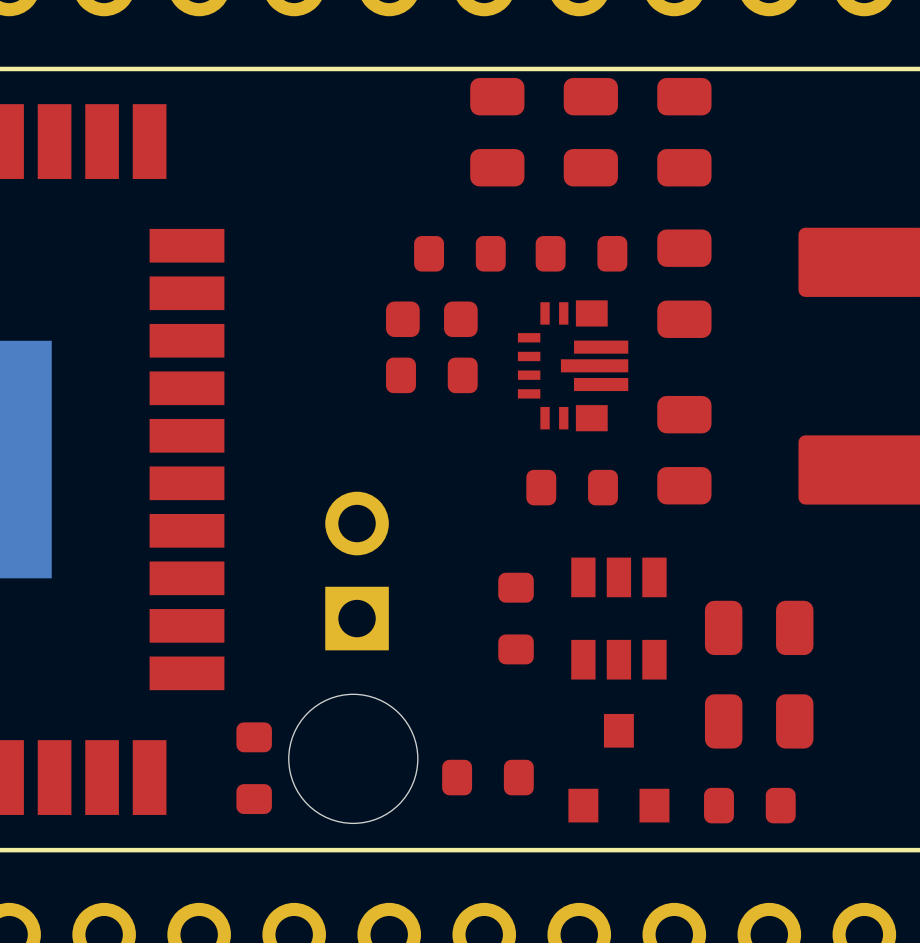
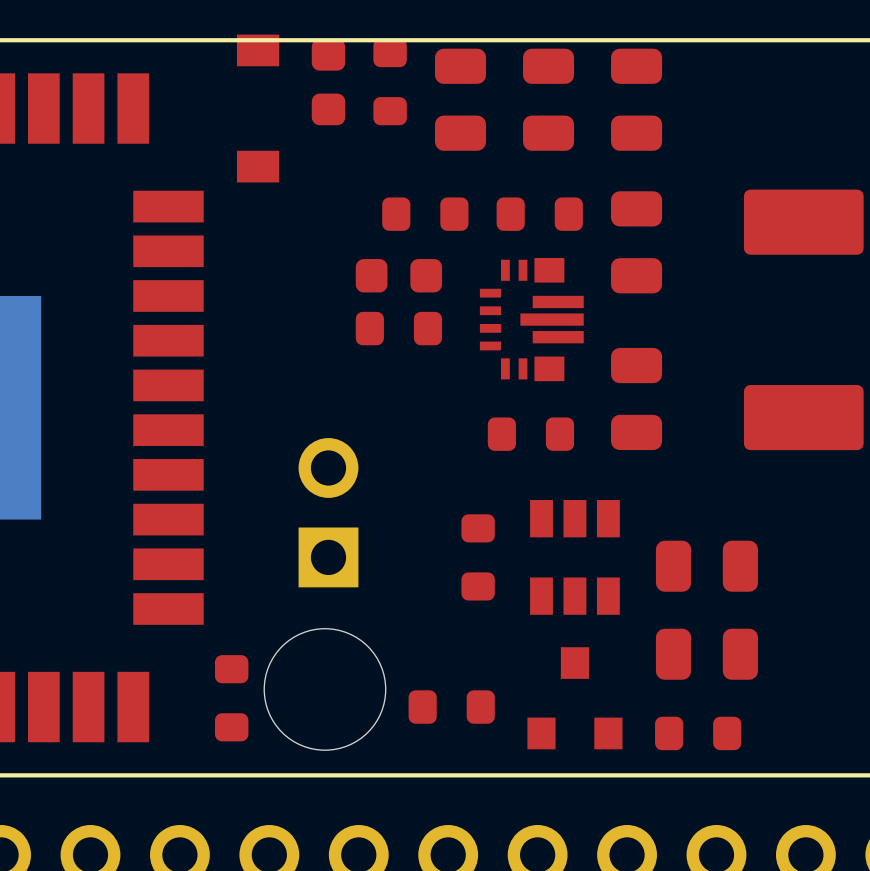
part: none -> (328, 82)
part: none -> (390, 82)
part: none -> (258, 108)

